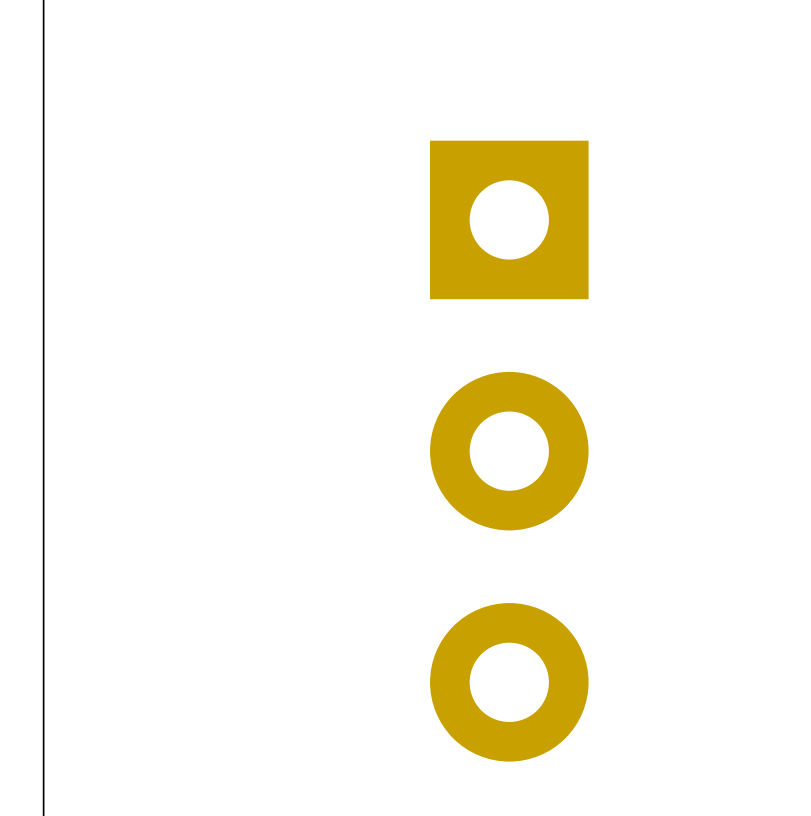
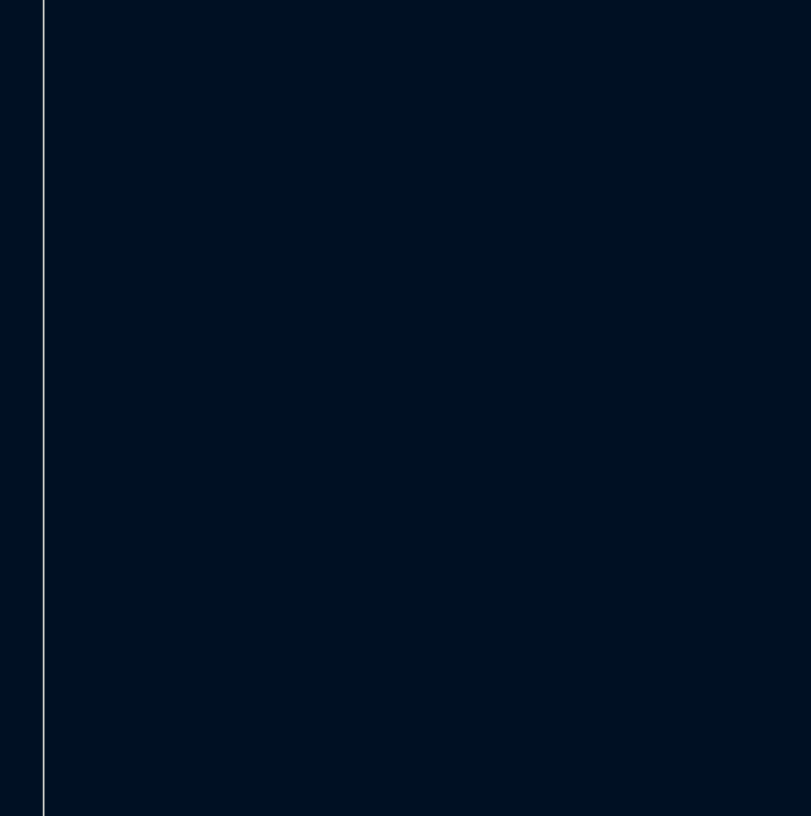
part: (509, 451) -> none

